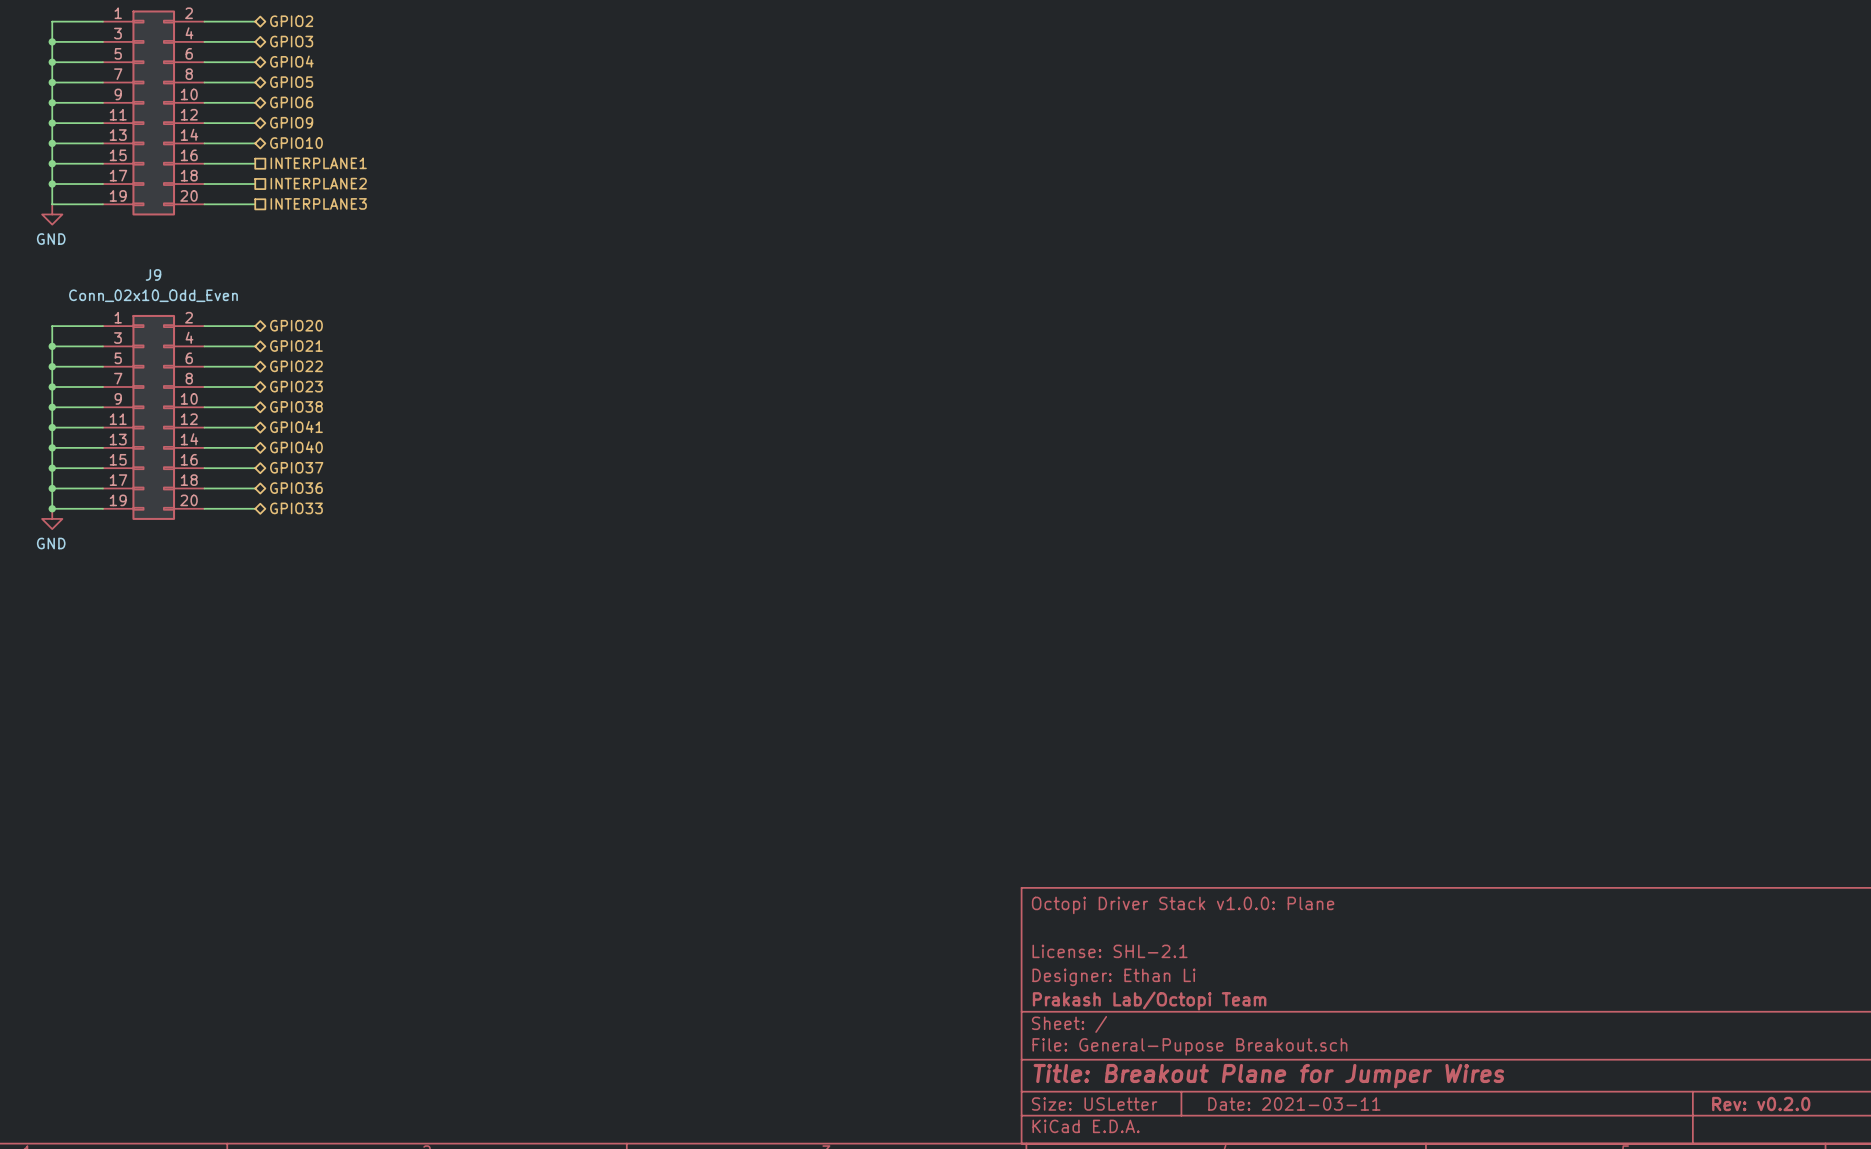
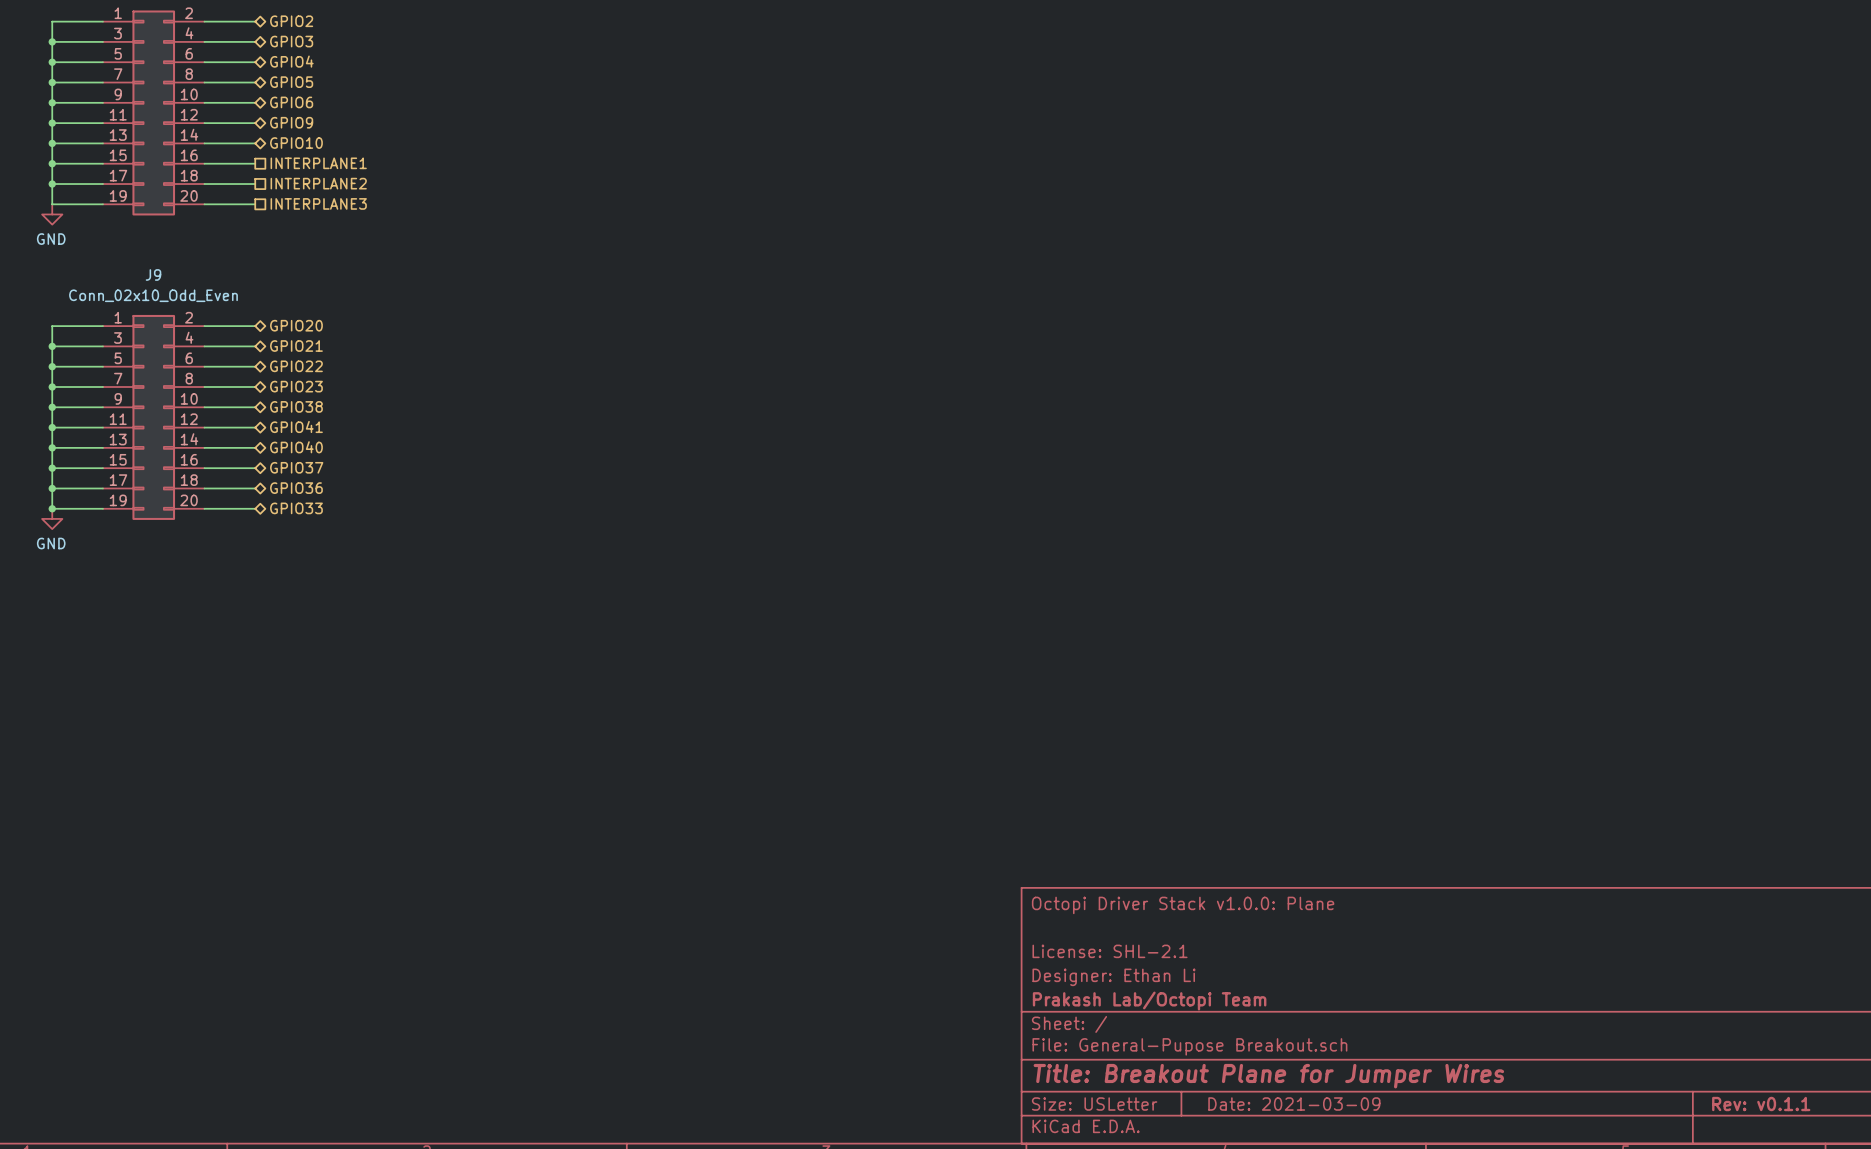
title block: Date: 2021-03-11 (1294, 1104) -> Date: 2021-03-09 (1294, 1104)
title block: Rev: v0.2.0 (1761, 1104) -> Rev: v0.1.1 (1761, 1104)

